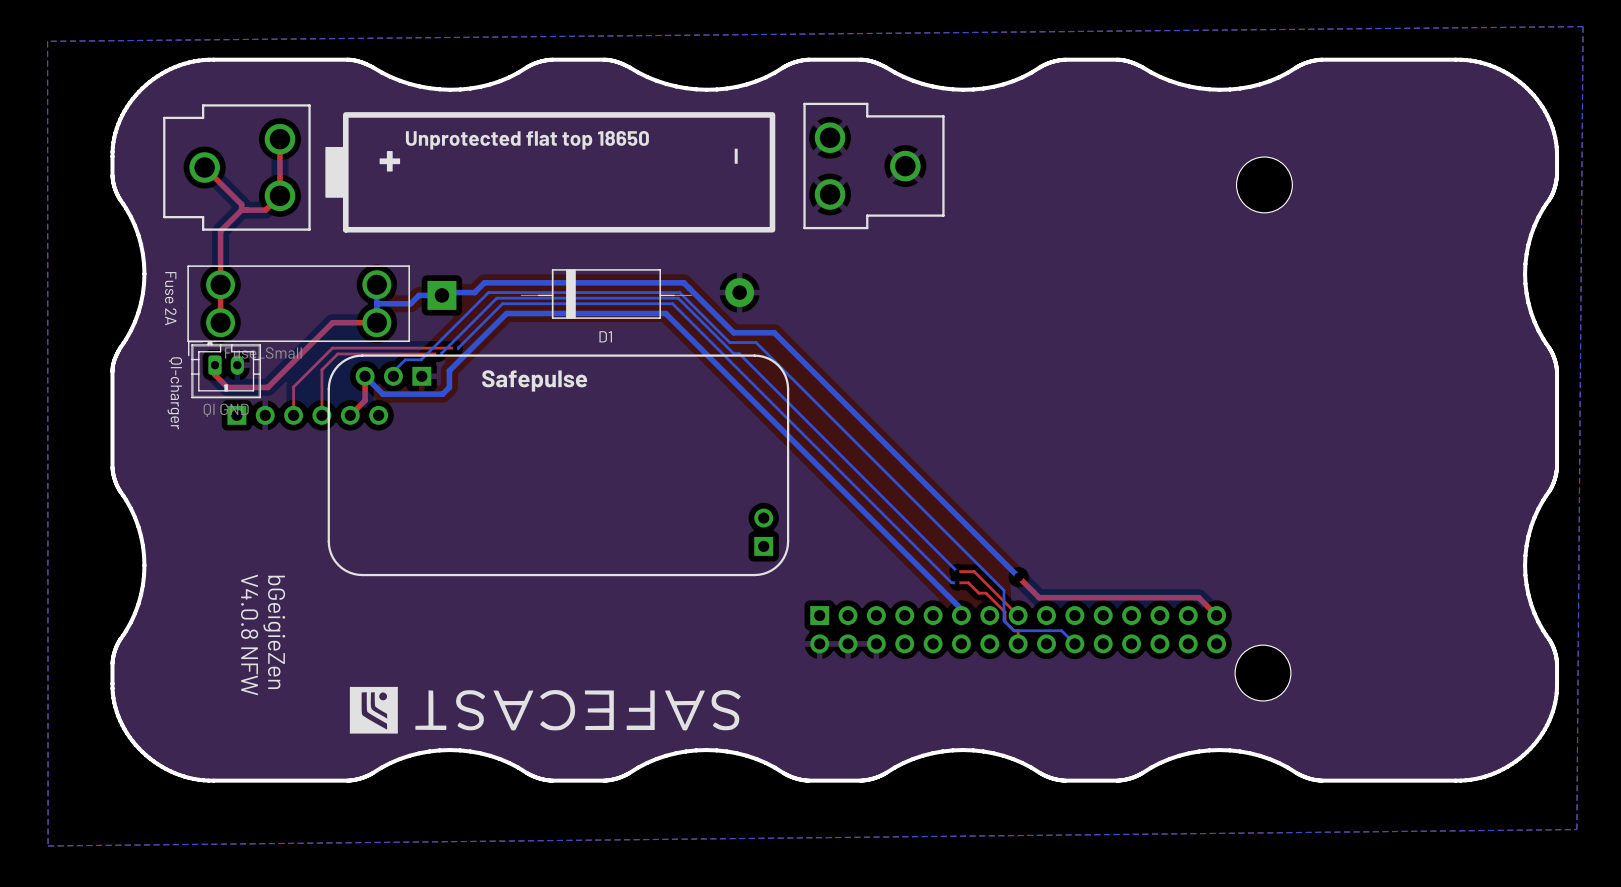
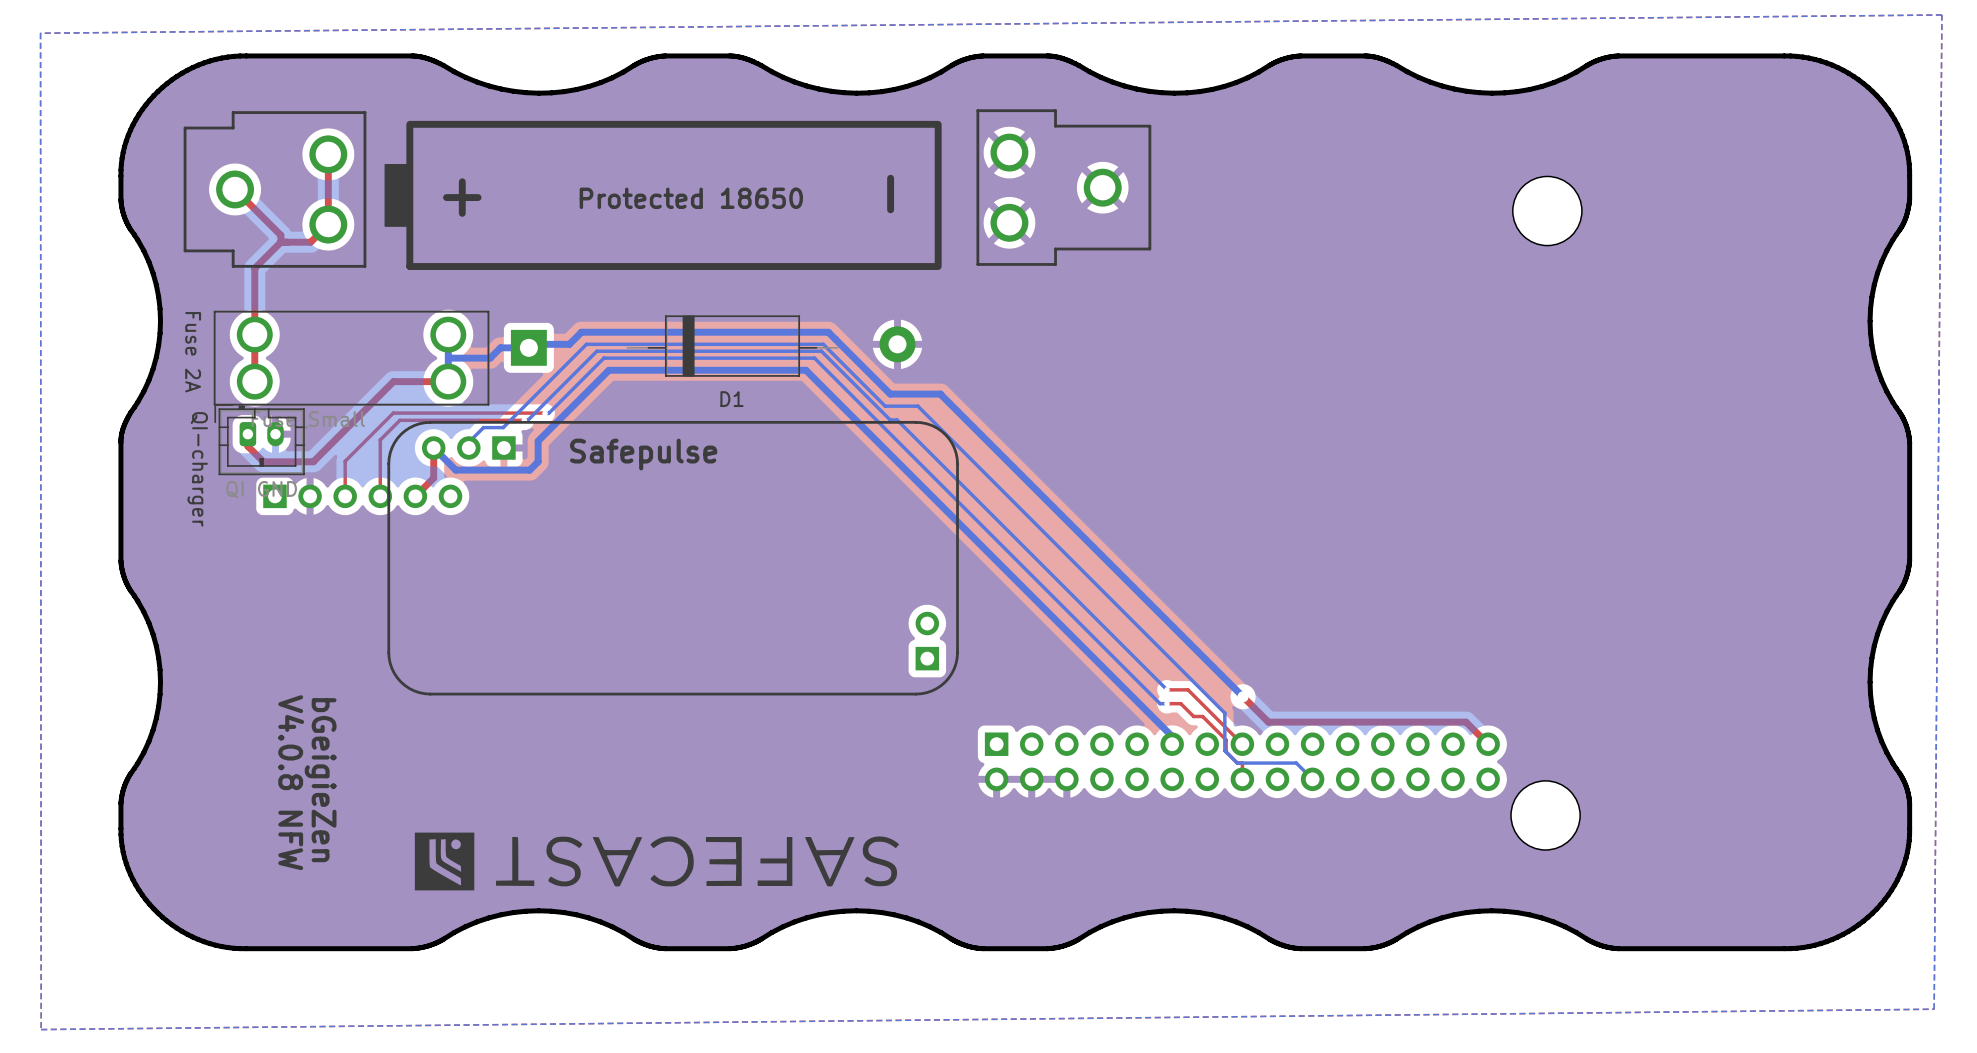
drawing shape: [325, 112, 776, 233] -> [384, 120, 942, 270]

